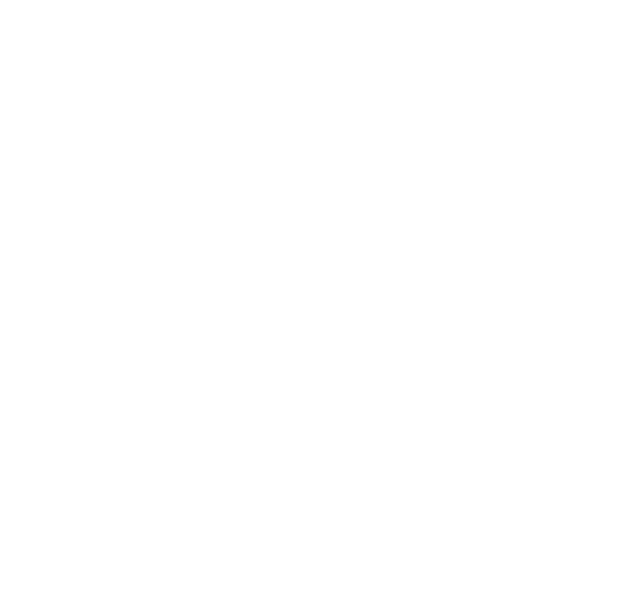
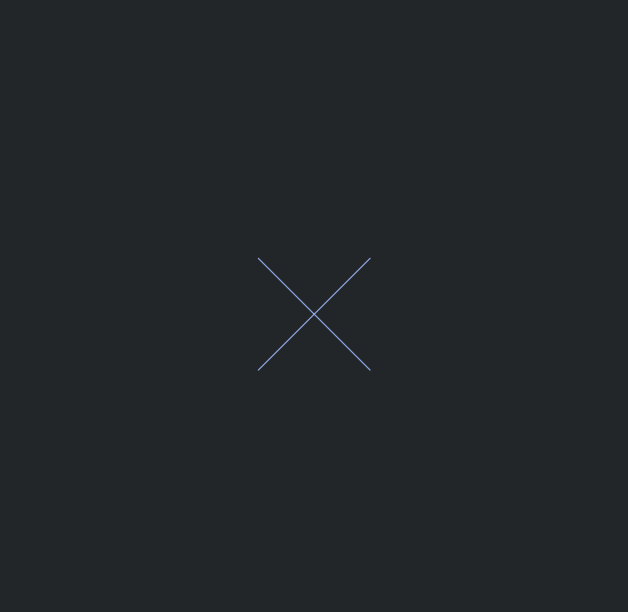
no-connect mark: none -> (314, 314)

